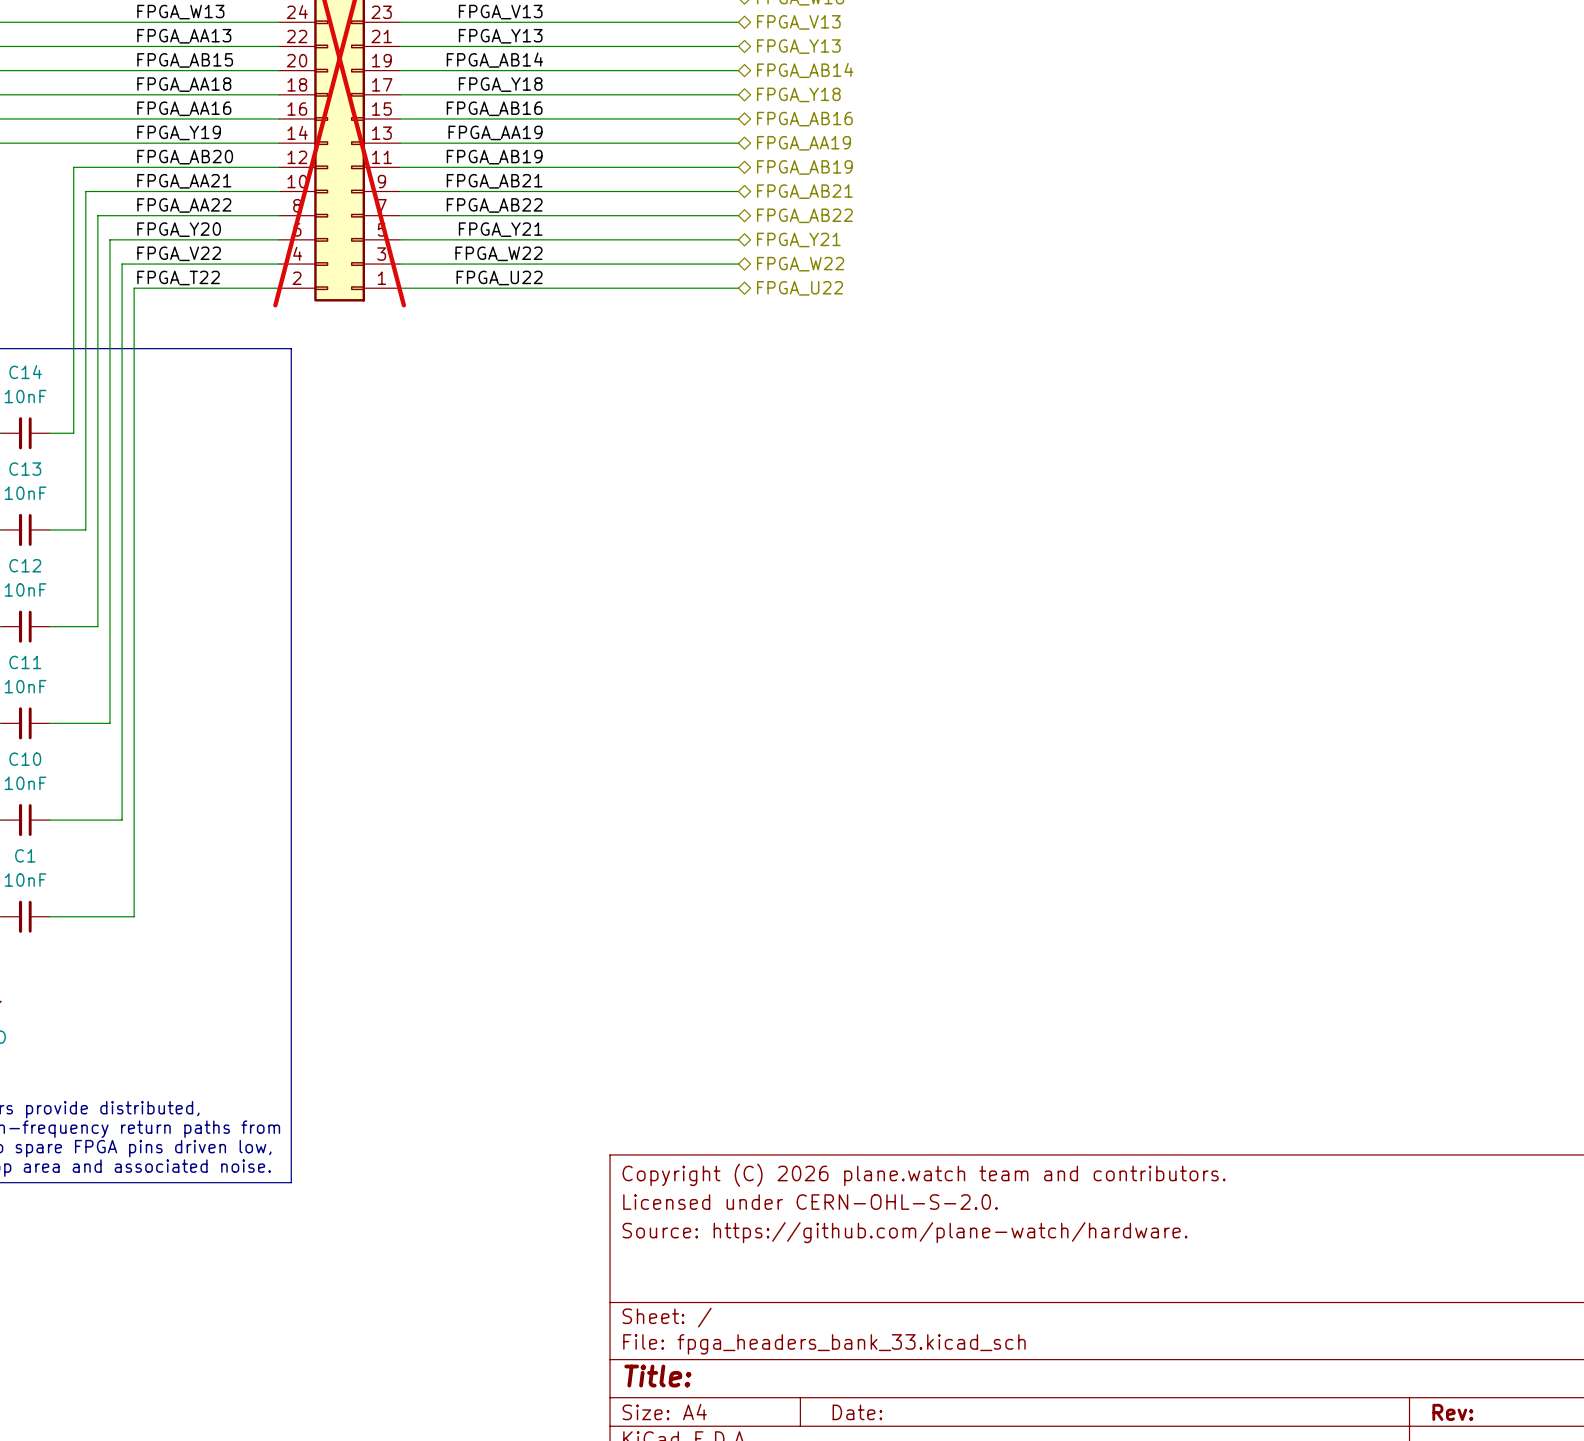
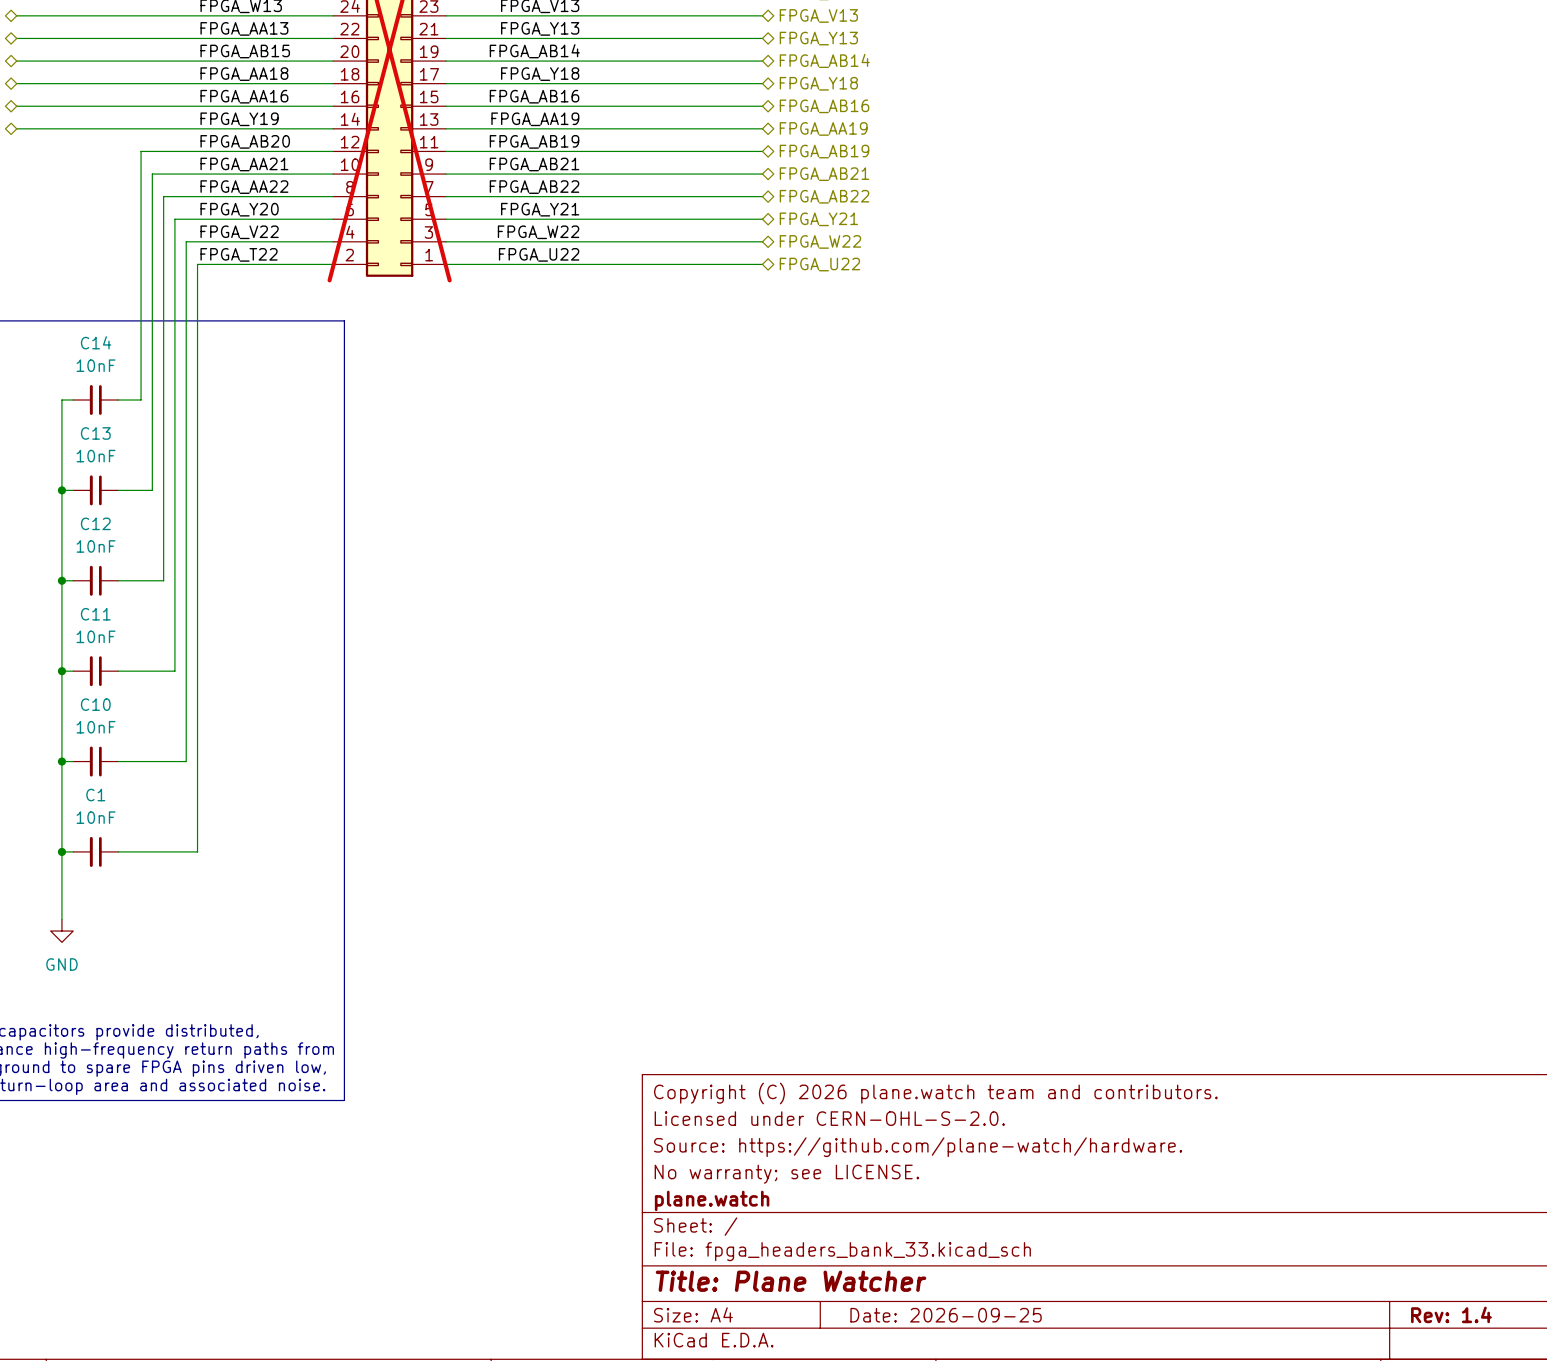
title block: none -> No warranty; see LICENSE. (786, 1174)
title block: none -> plane.watch (712, 1200)
title block: Title: (657, 1376) -> Title: Plane Watcher (791, 1281)
title block: Date: (857, 1412) -> Date: 2026-09-25 (946, 1315)
title block: Rev: (1452, 1412) -> Rev: 1.4 (1451, 1314)

